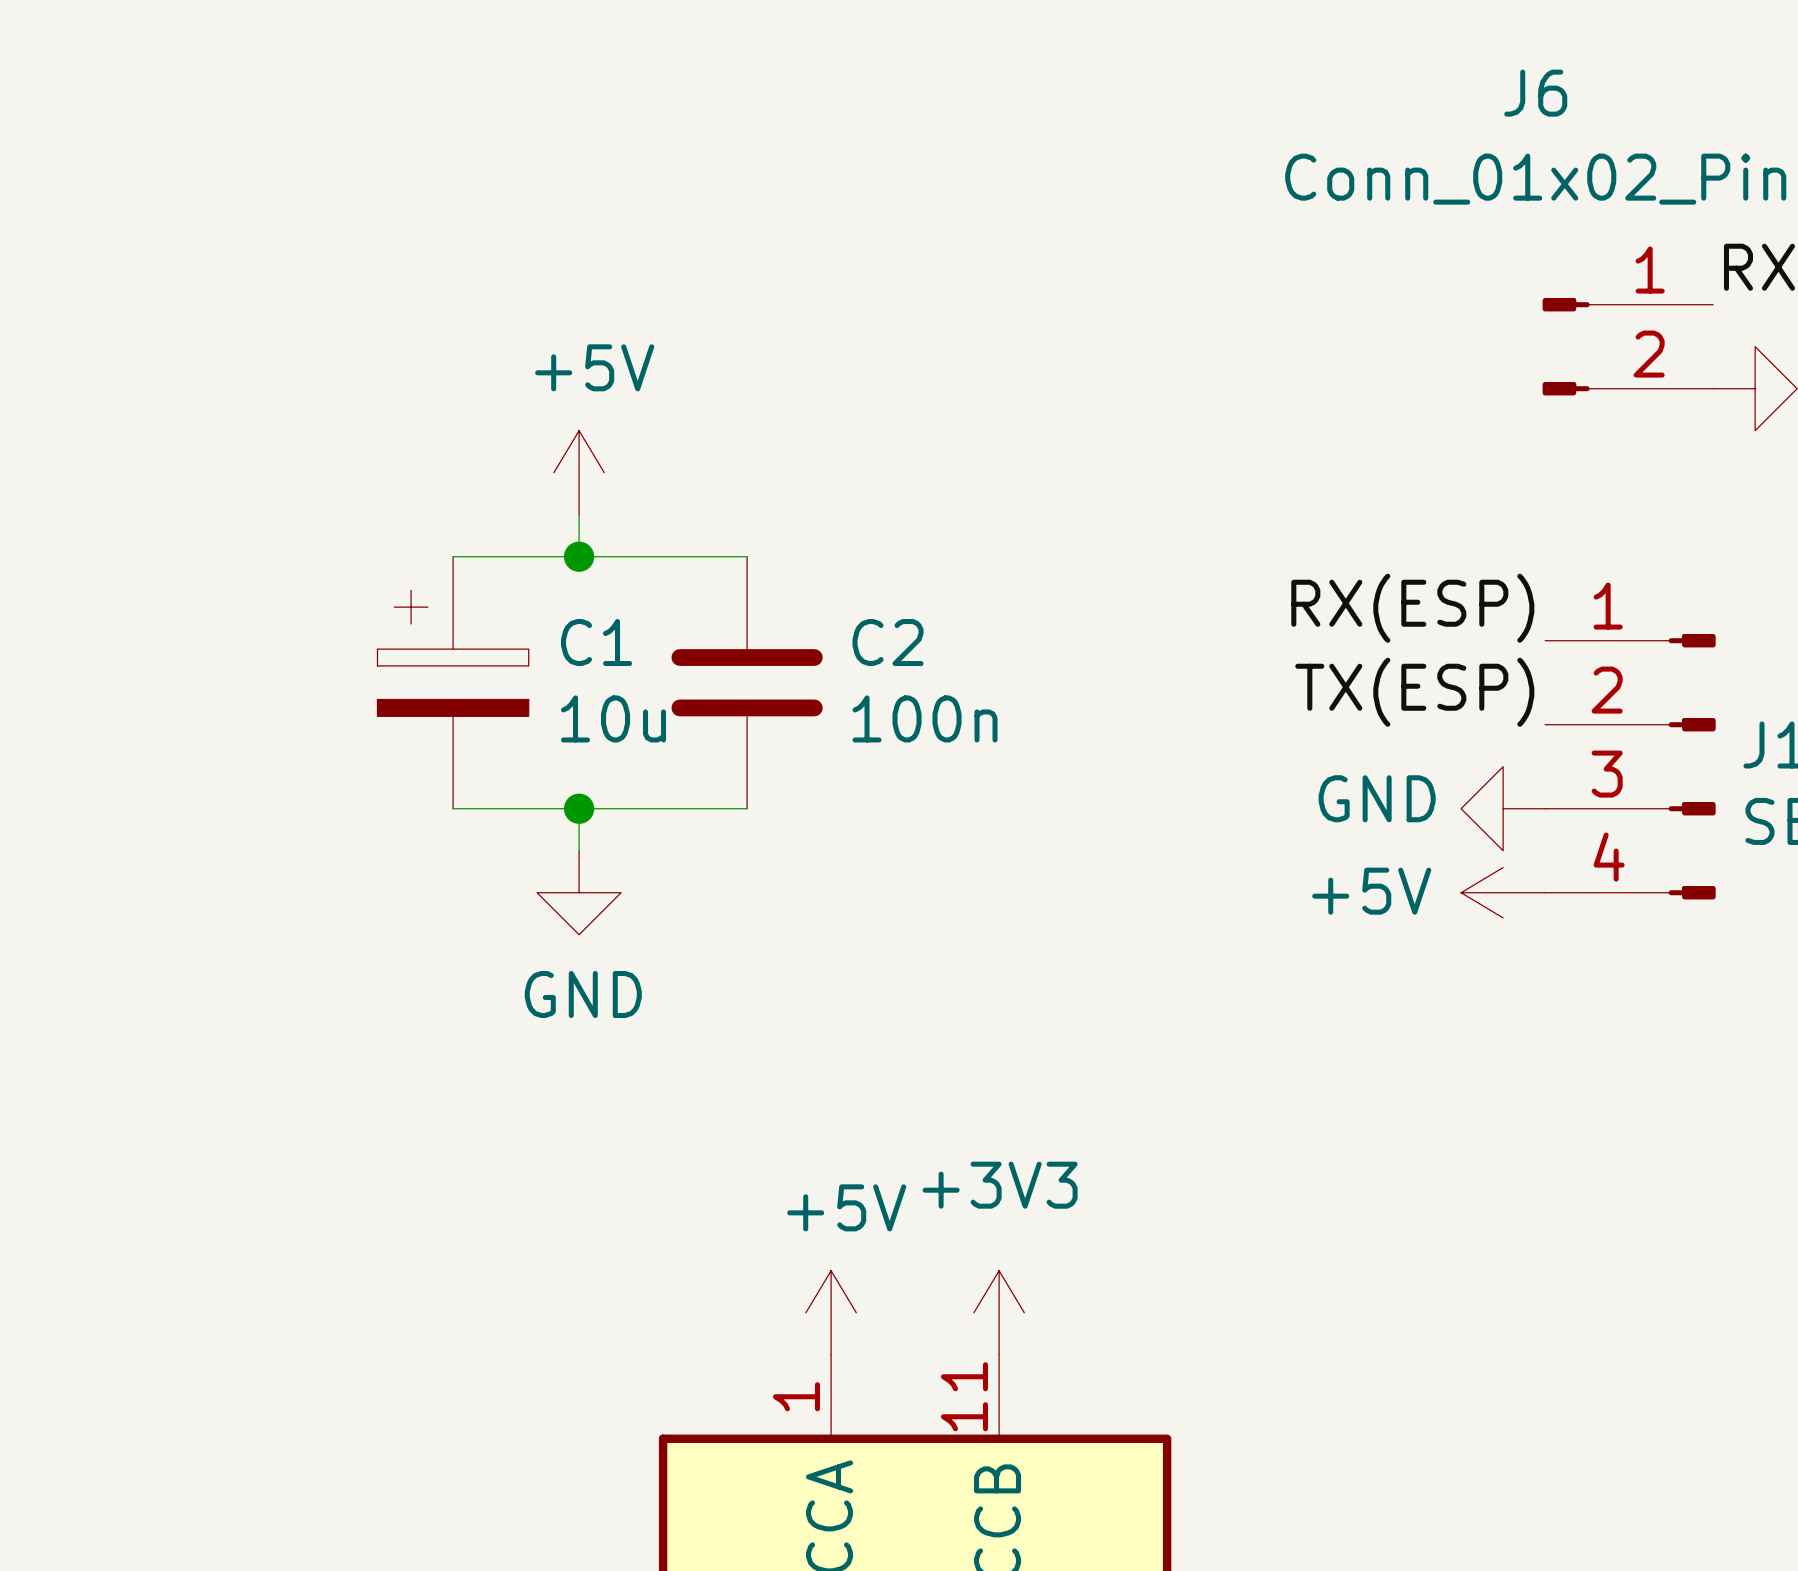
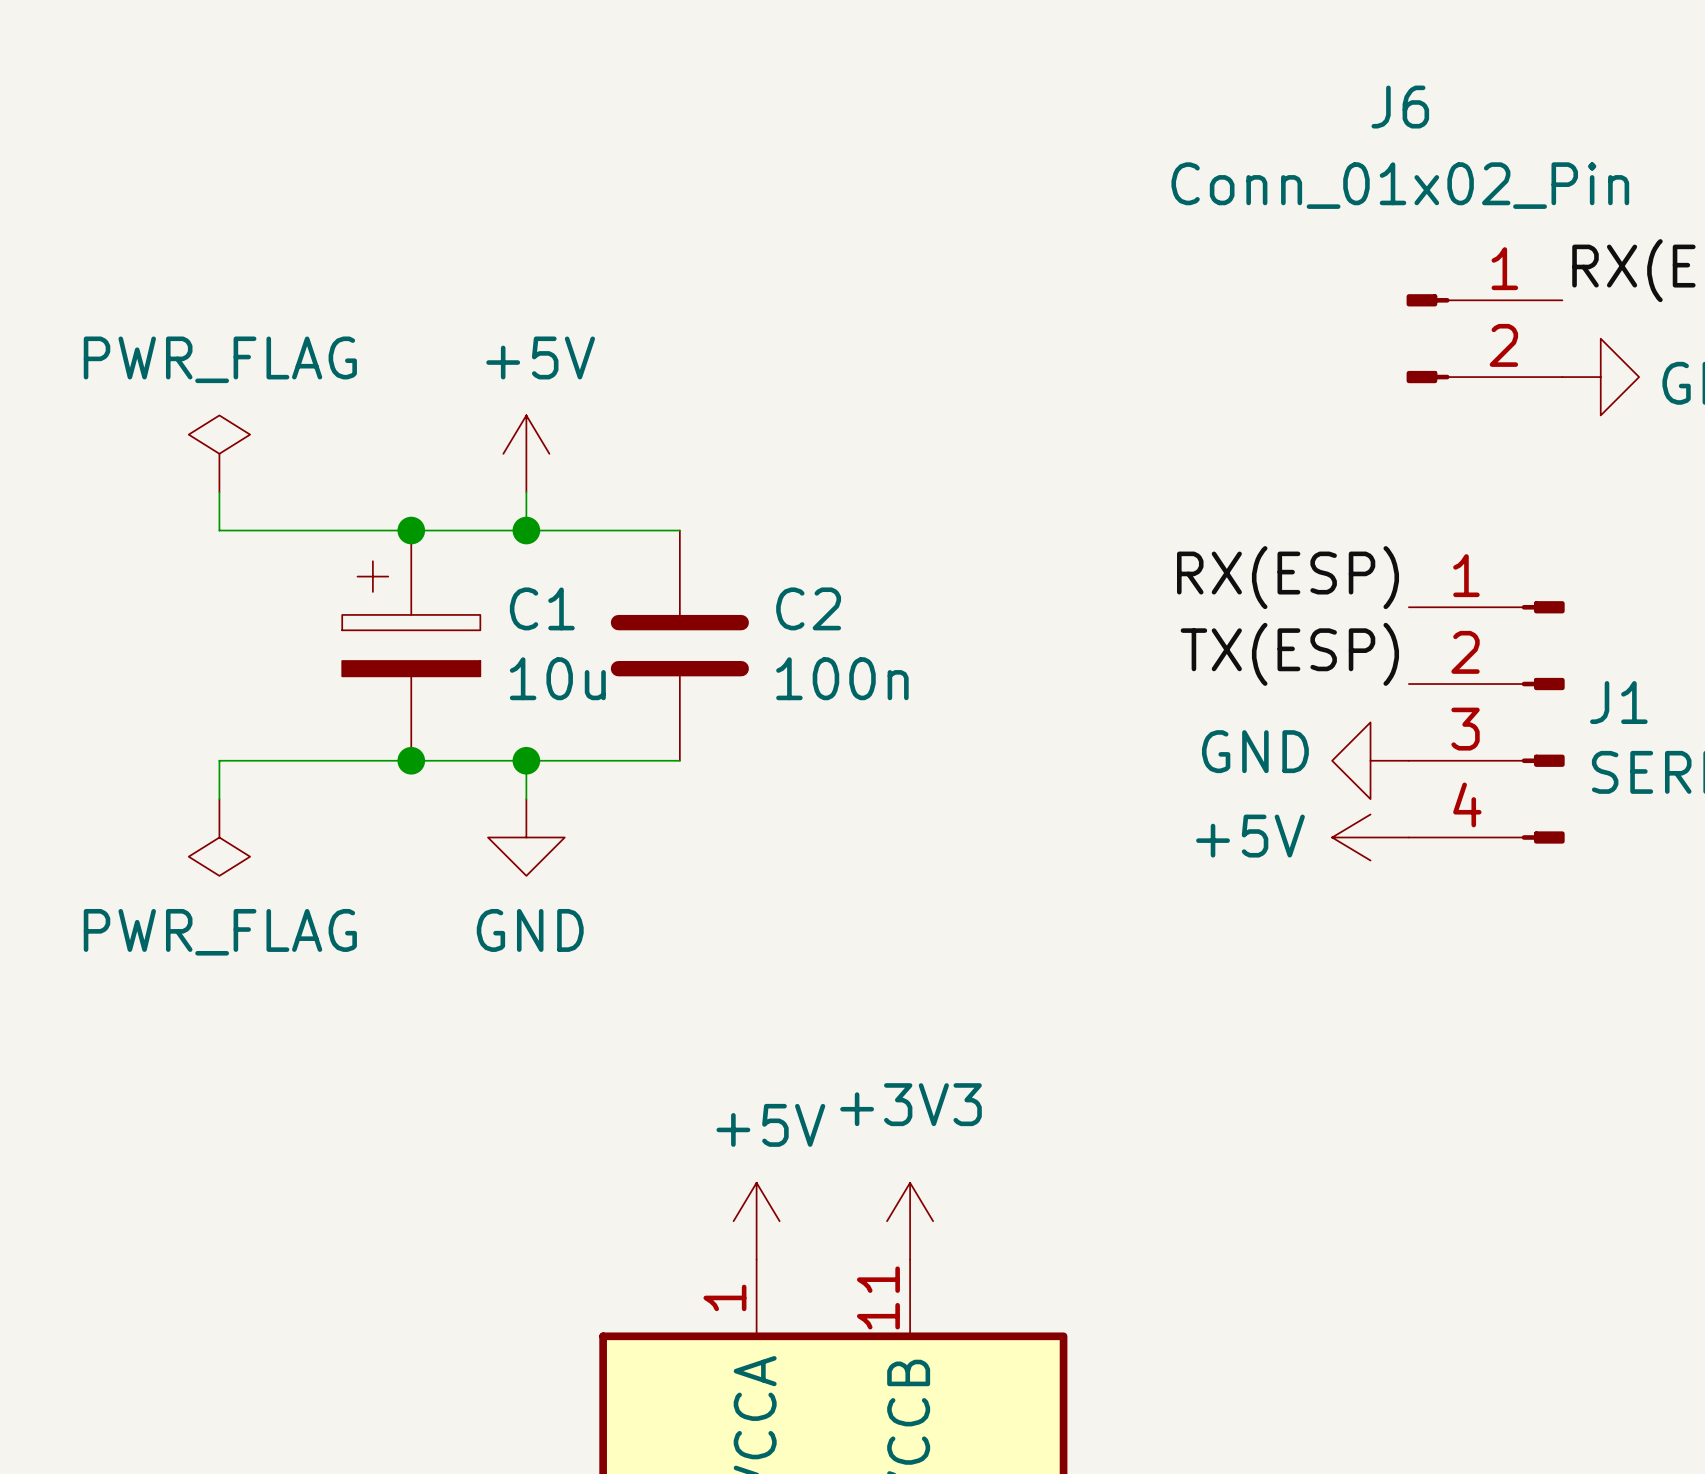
power symbol: none -> PWR_FLAG (219, 453)
wire: none -> (219, 492) (219, 530) (411, 530)
junction: none -> (411, 530)
wire: none -> (411, 760) (219, 760) (219, 799)
junction: none -> (411, 760)
power symbol: none -> PWR_FLAG (219, 837)

